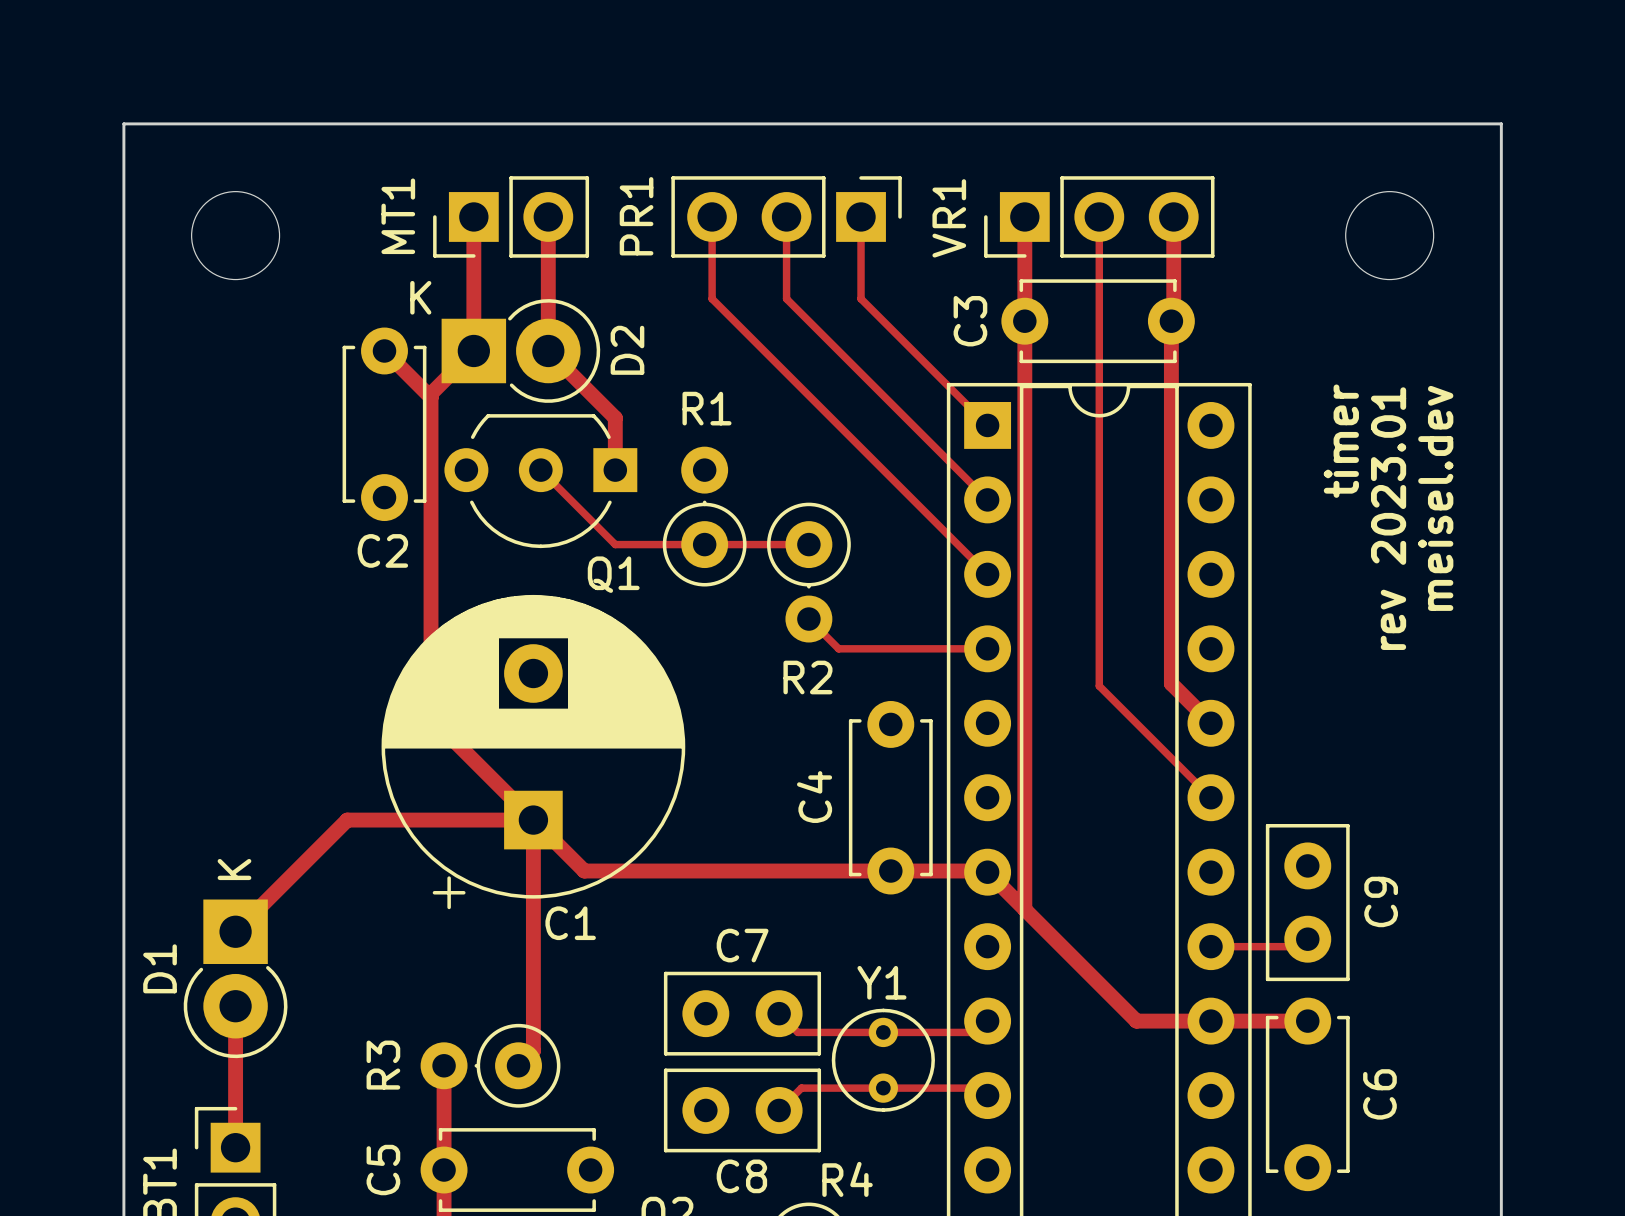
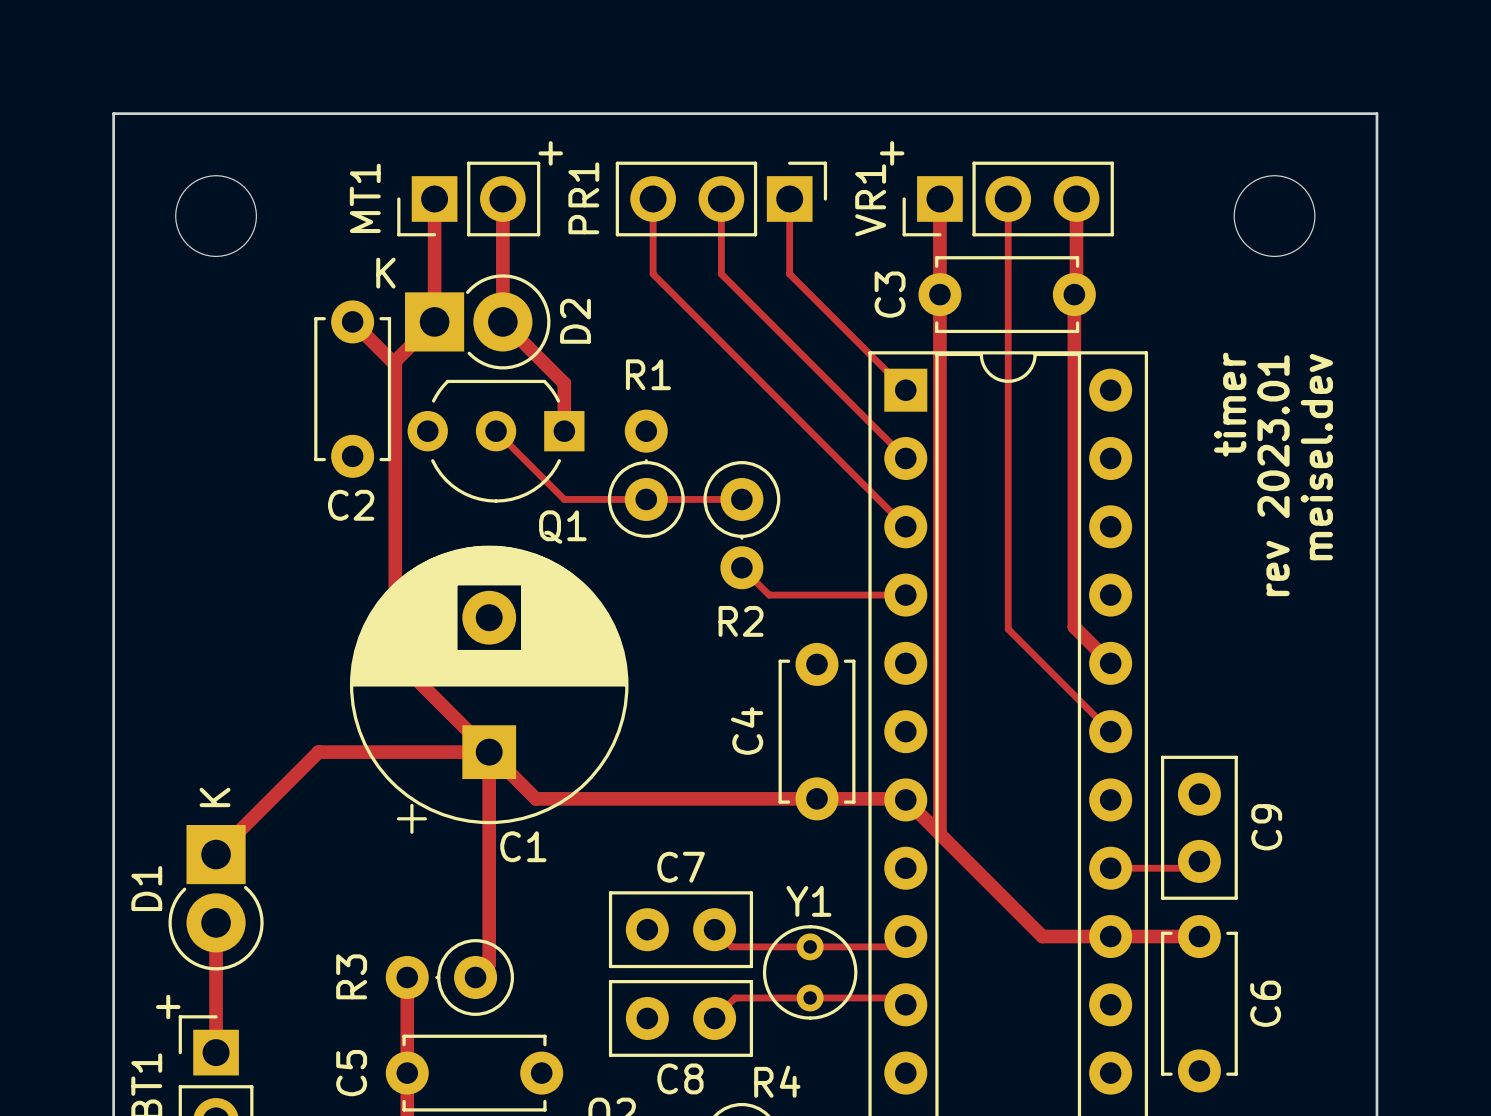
text: none -> + (550, 153)
text: none -> + (892, 153)
text: none -> + (168, 1007)

